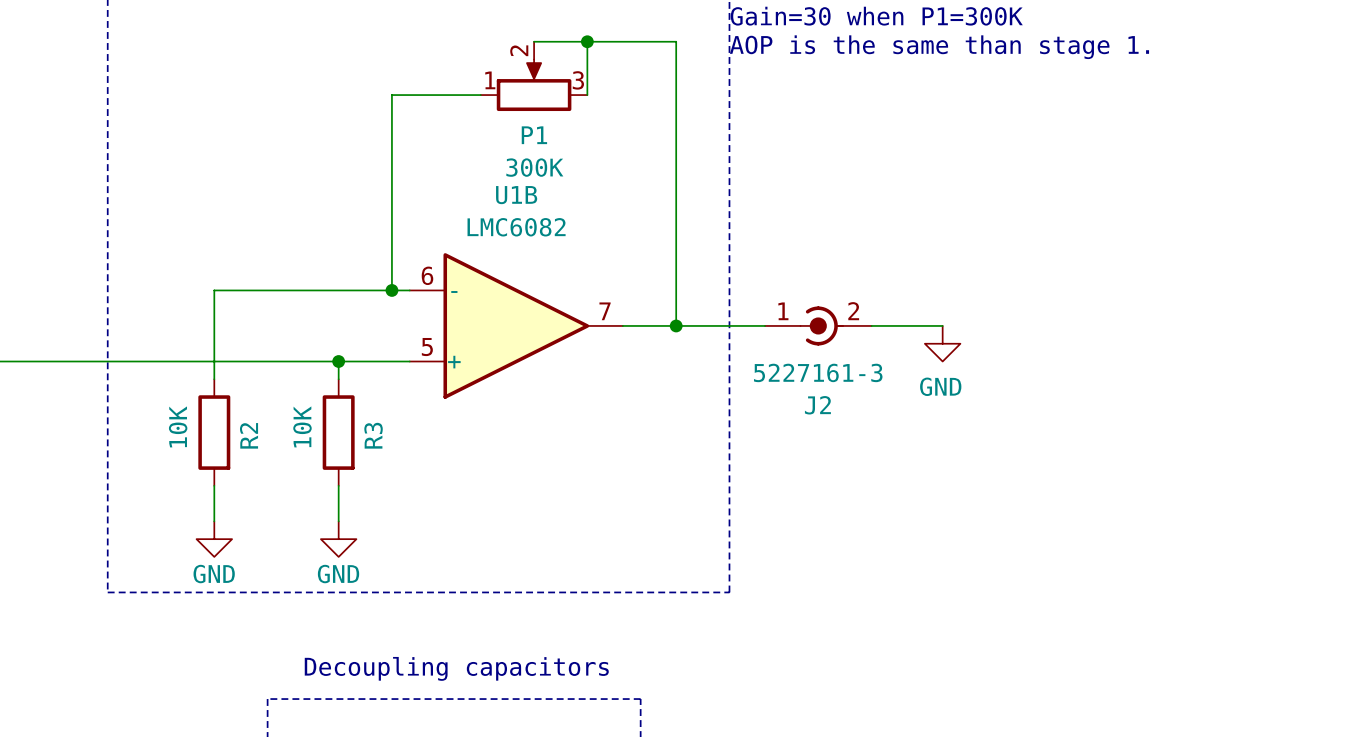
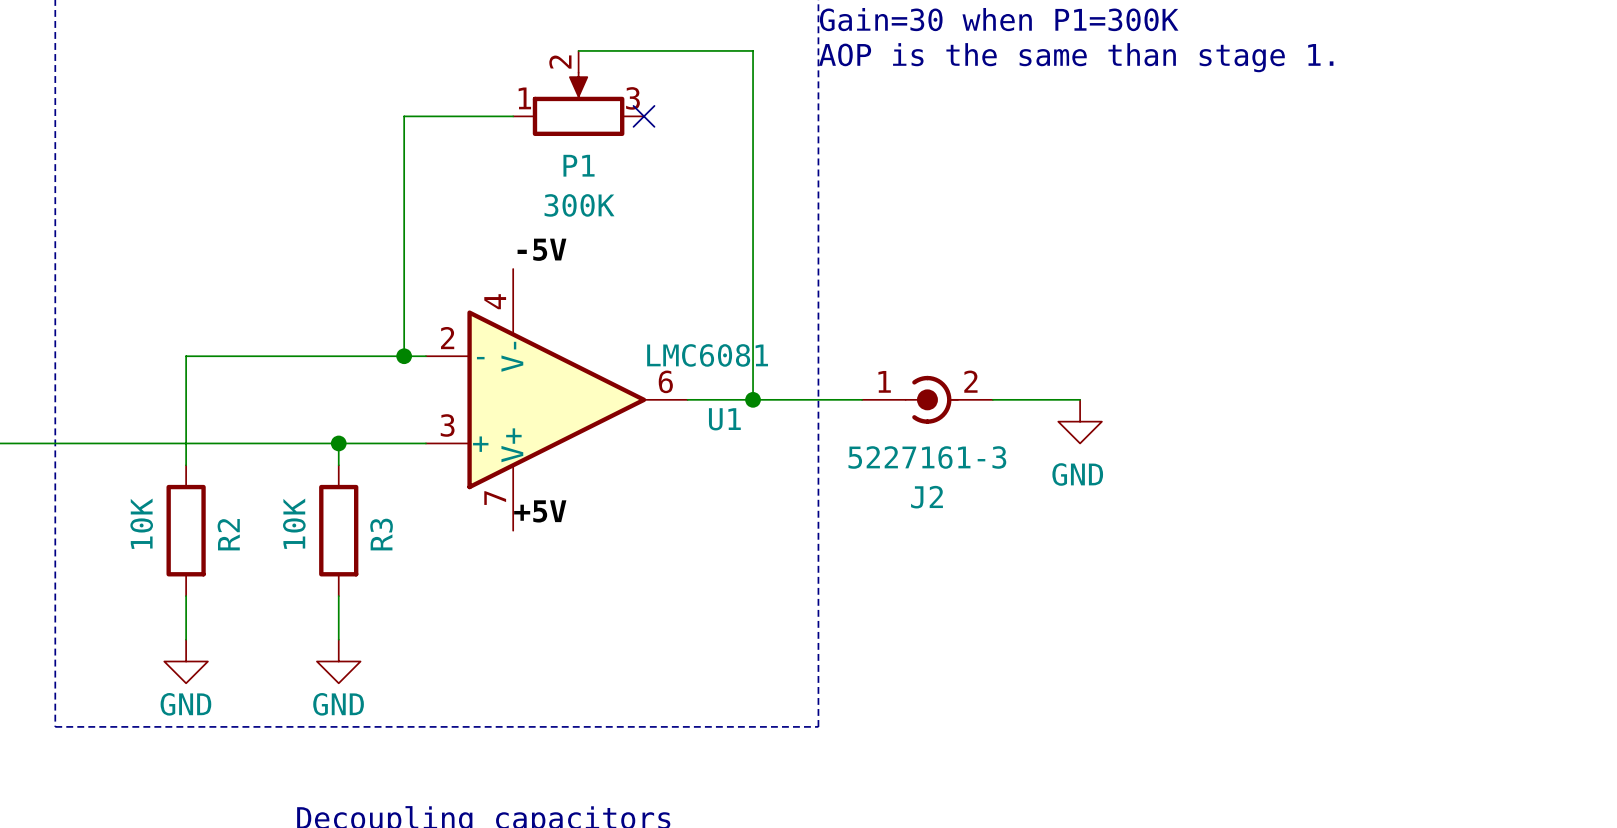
wire: (587, 41) (587, 95) -> none
junction: (587, 41) -> none
no-connect mark: none -> (644, 116)
label: none -> -5V (541, 249)
U1B: LMC6082 (516, 325) -> none
U1: none -> LMC6081 (556, 399)
label: none -> +5V (540, 511)

